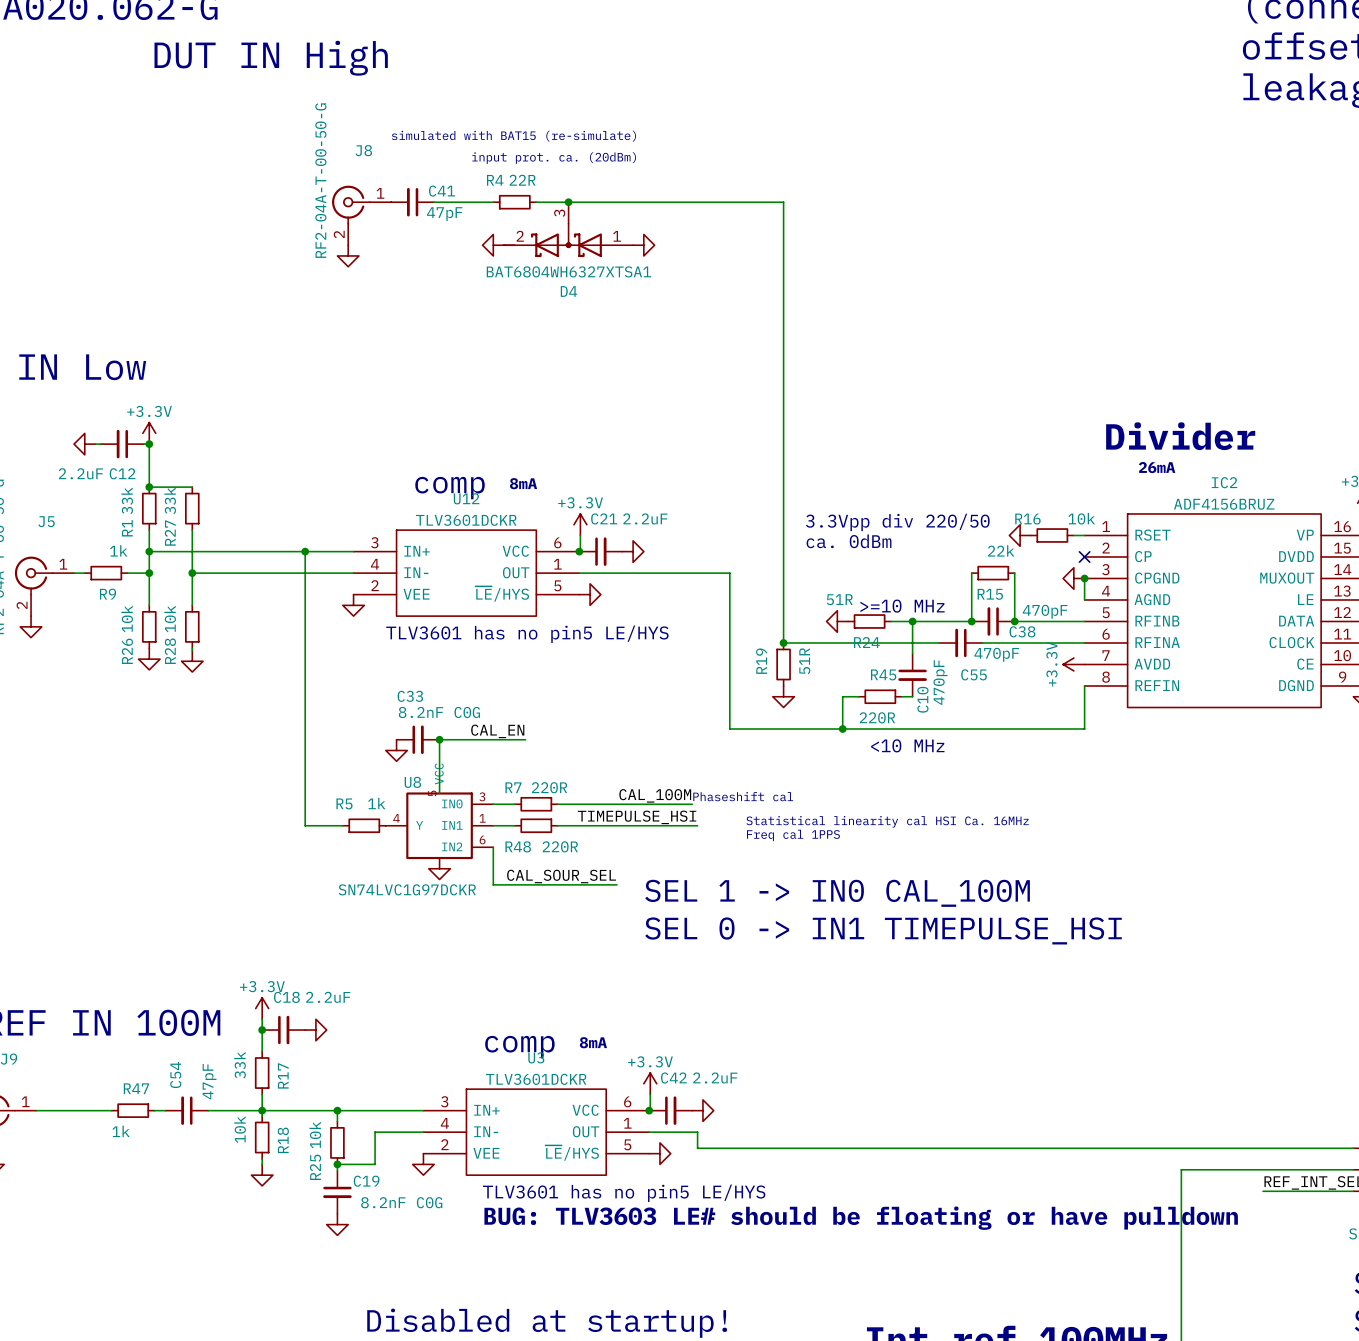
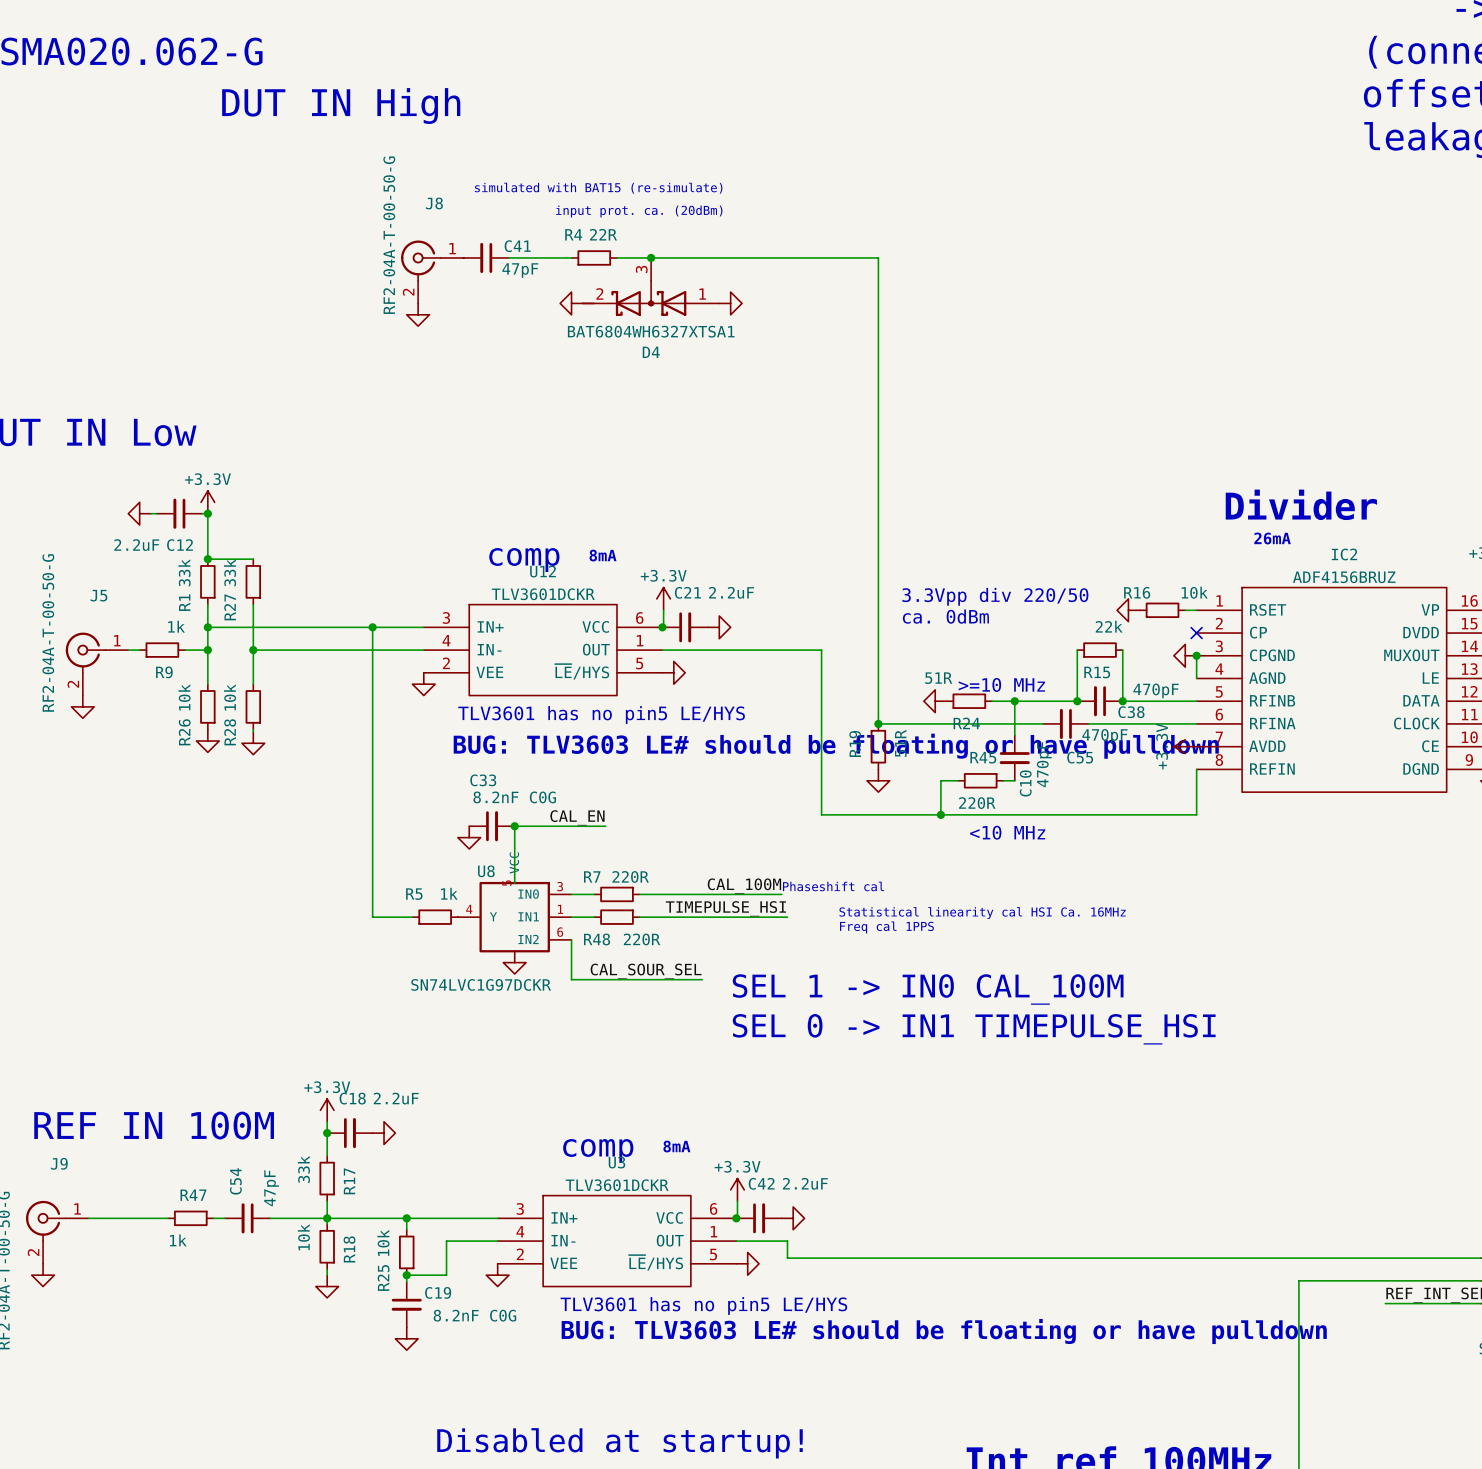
text: none -> BUG: TLV3603 LE# should be floating or have pulldown (836, 746)

